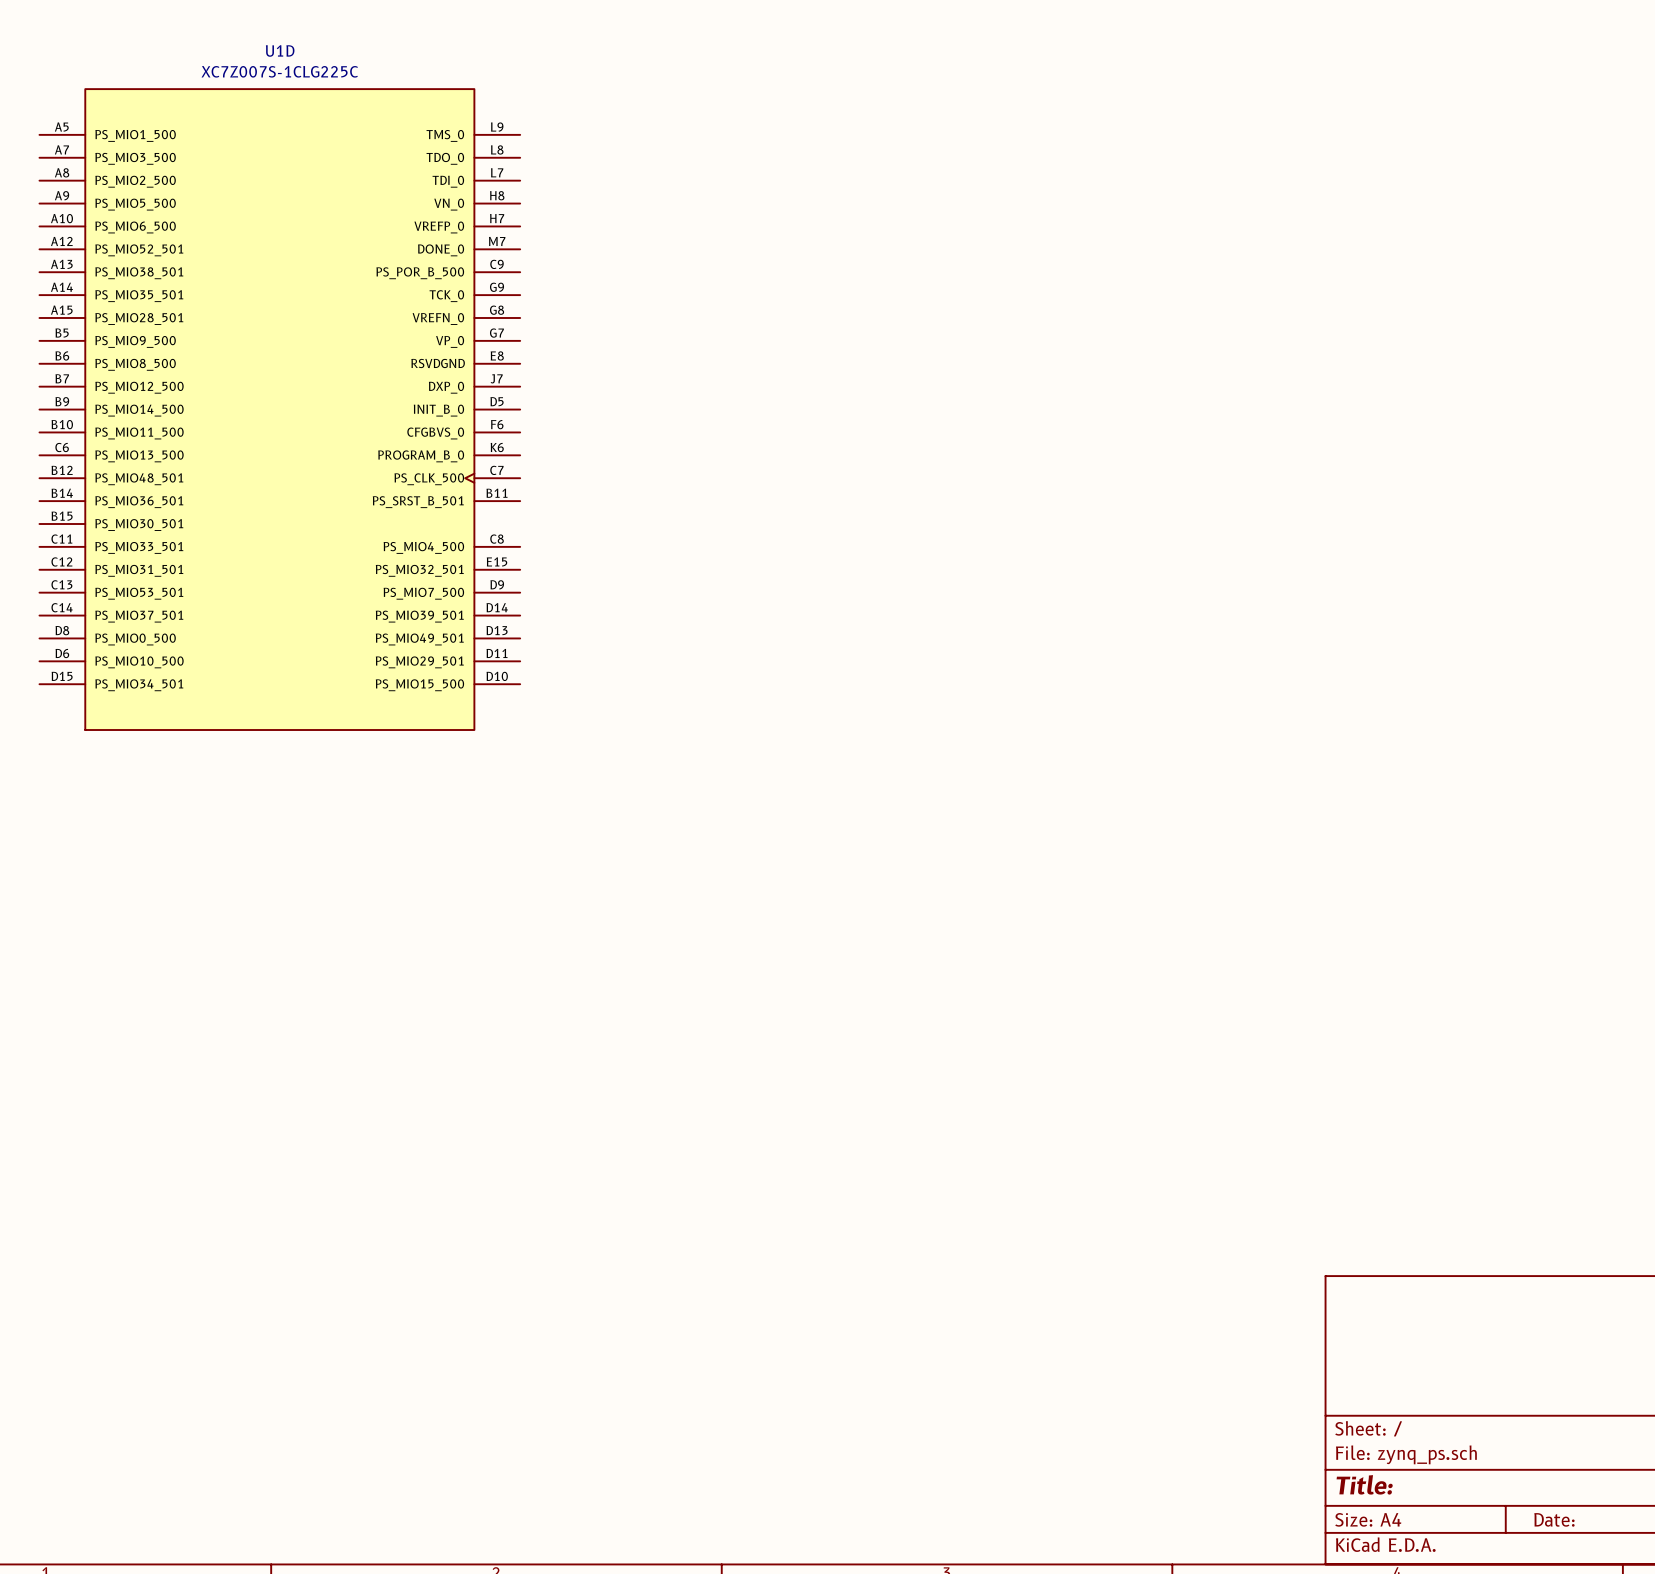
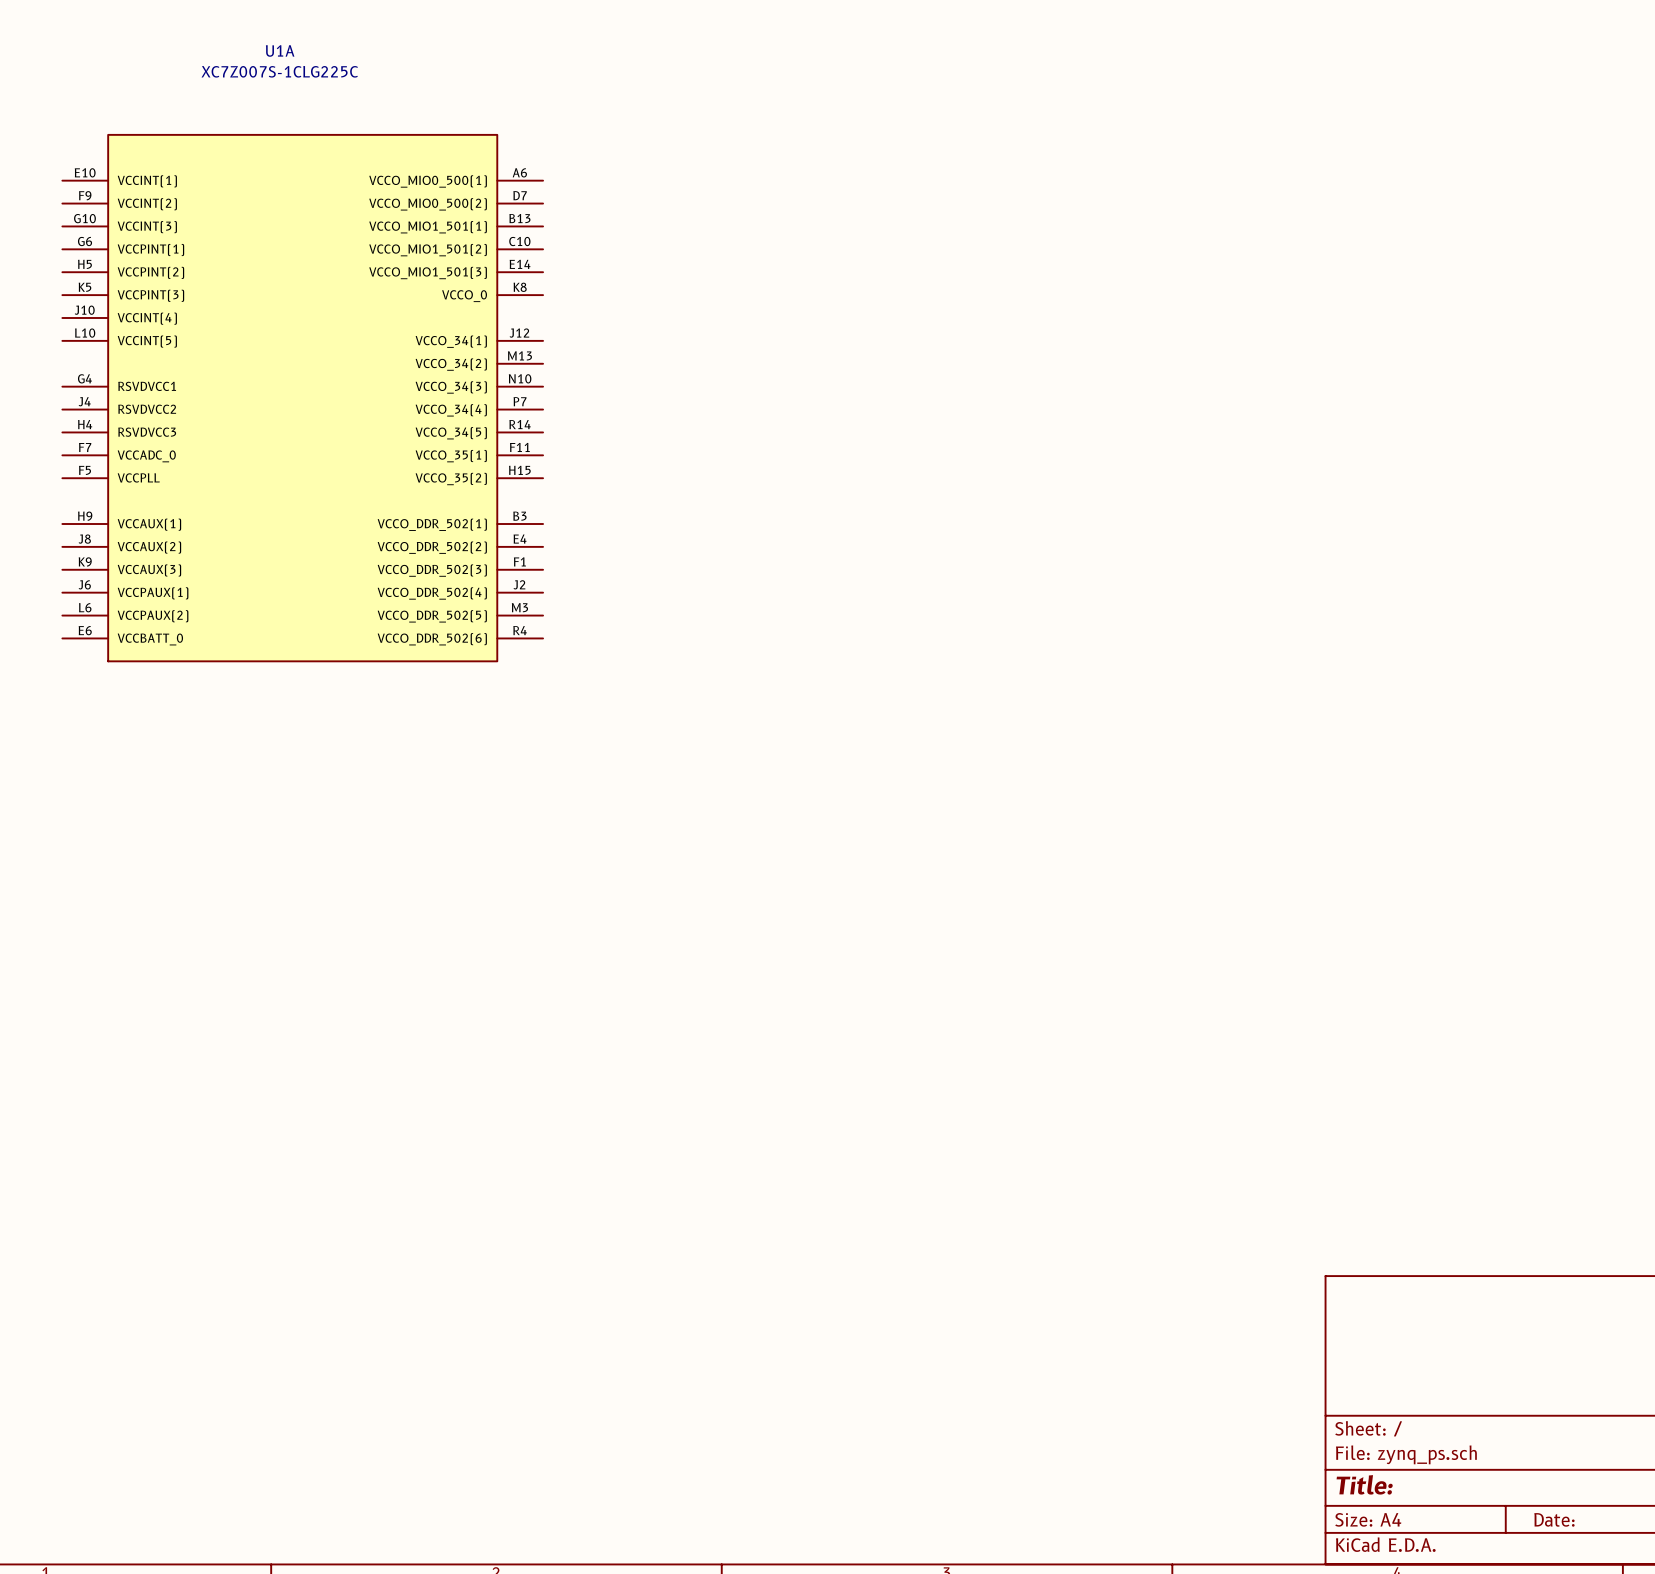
U1A: none -> XC7Z007S-1CLG225C (302, 398)
U1D: XC7Z007S-1CLG225C (279, 409) -> none

